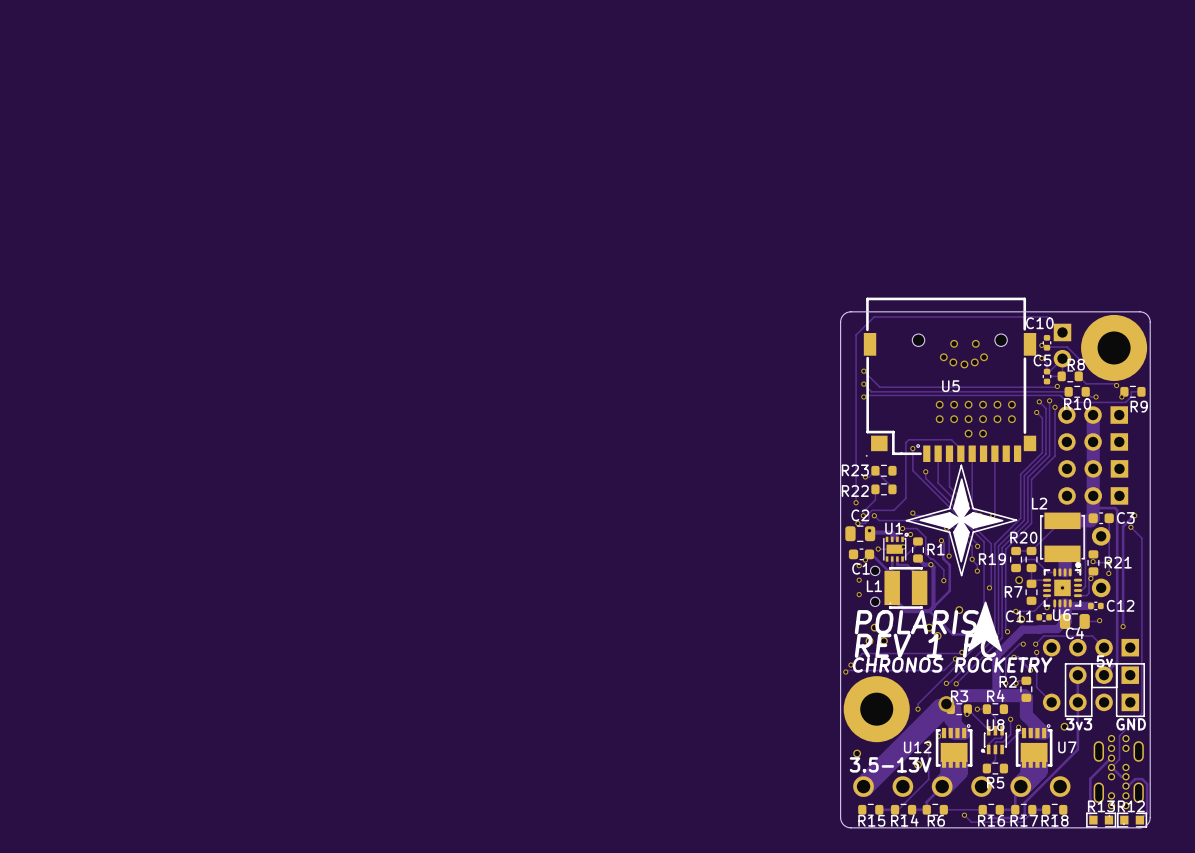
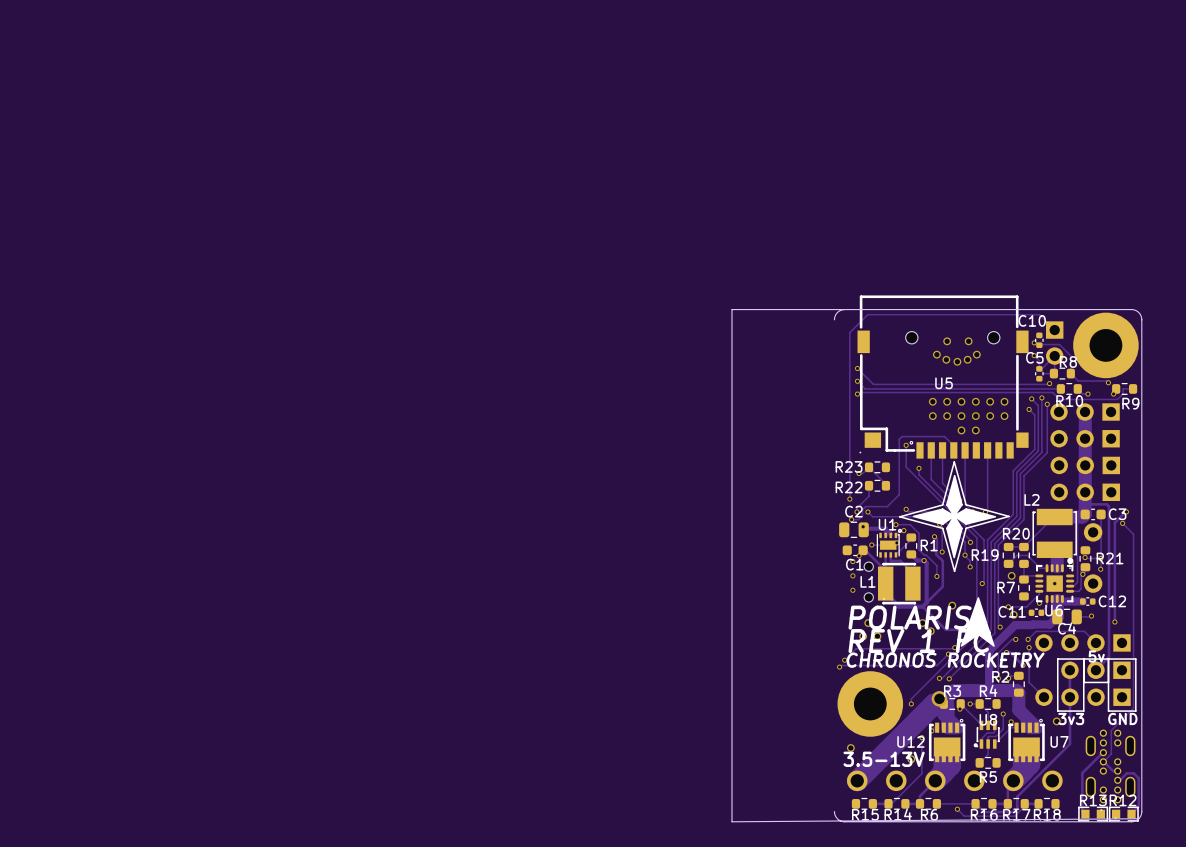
board edge: none -> (844, 309) (732, 309) (732, 821) (1138, 818)
board edge: (840, 322) (840, 817) -> none

